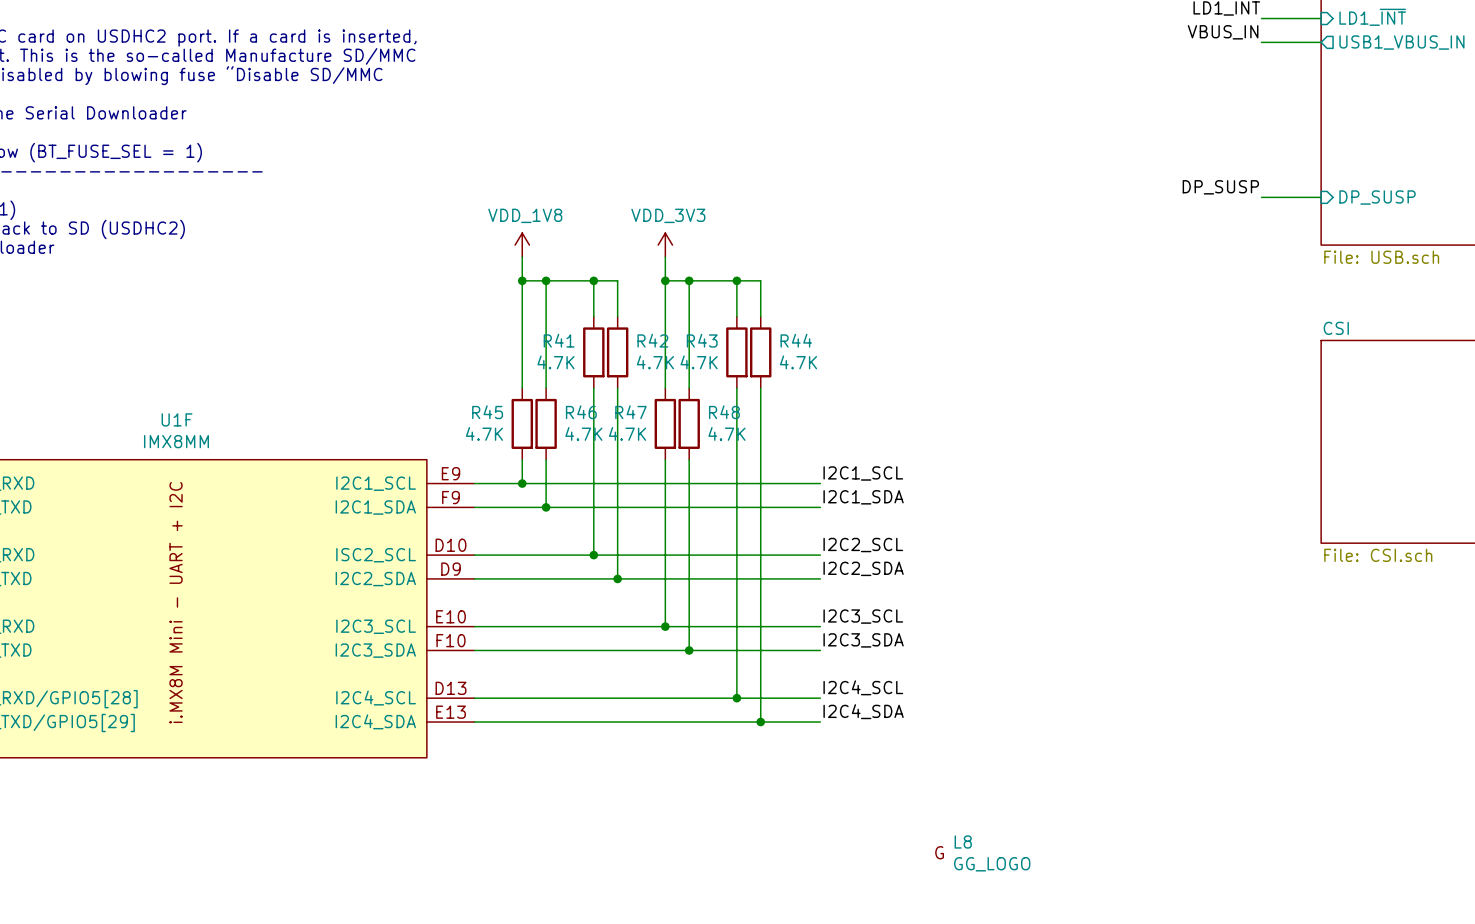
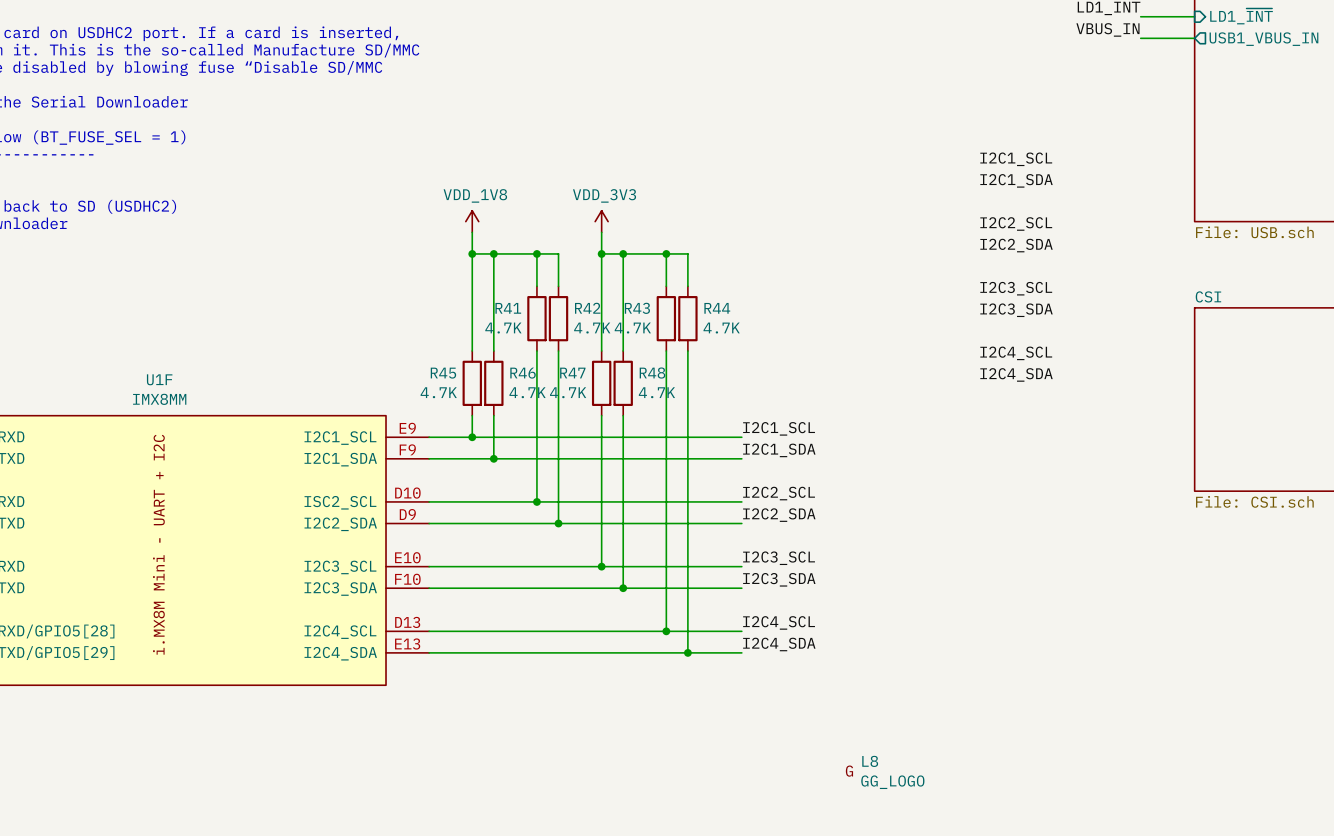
label: none -> I2C1_SCL (1016, 159)
label: DP_SUSP (1220, 187) -> none
wire: (1261, 197) (1321, 197) -> none
sheet pin: DP_SUSP (1377, 197) -> none
label: none -> I2C1_SDA (1016, 180)
label: none -> I2C2_SCL (1016, 223)
label: none -> I2C2_SDA (1016, 245)
label: none -> I2C3_SCL (1016, 288)
label: none -> I2C3_SDA (1016, 310)
label: none -> I2C4_SCL (1016, 353)
label: none -> I2C4_SDA (1016, 374)

